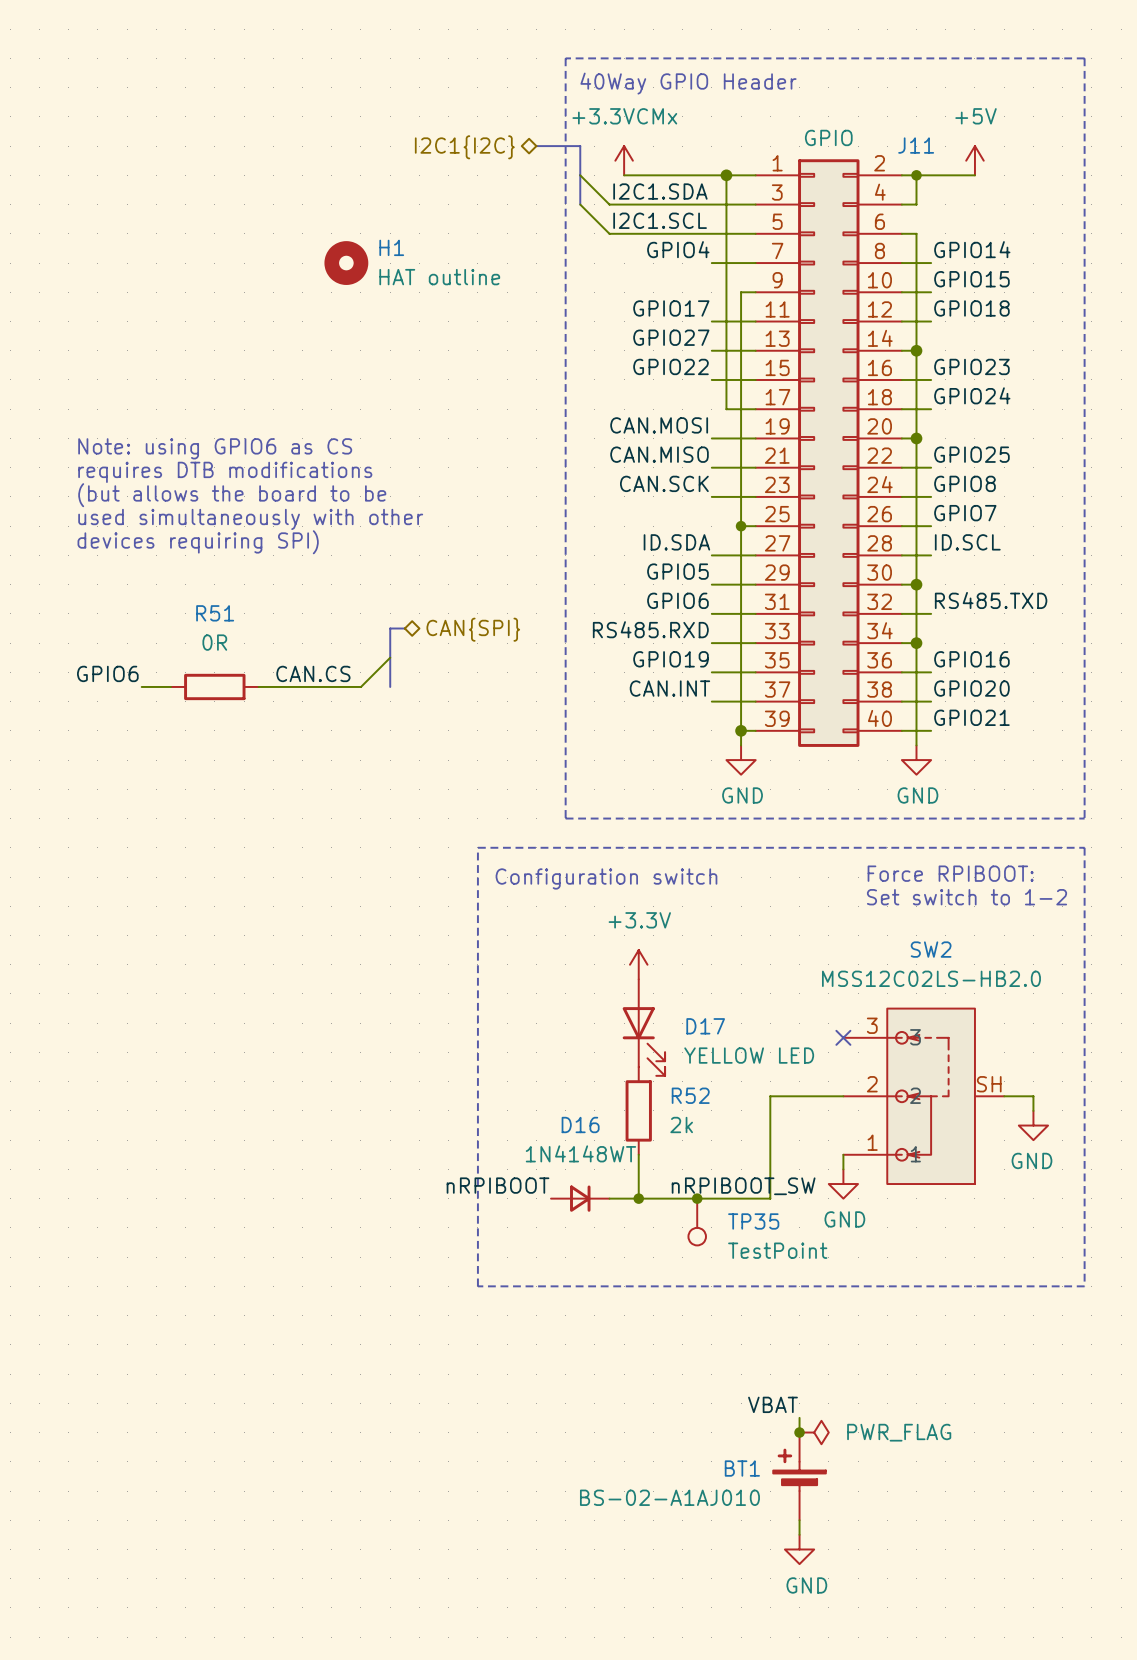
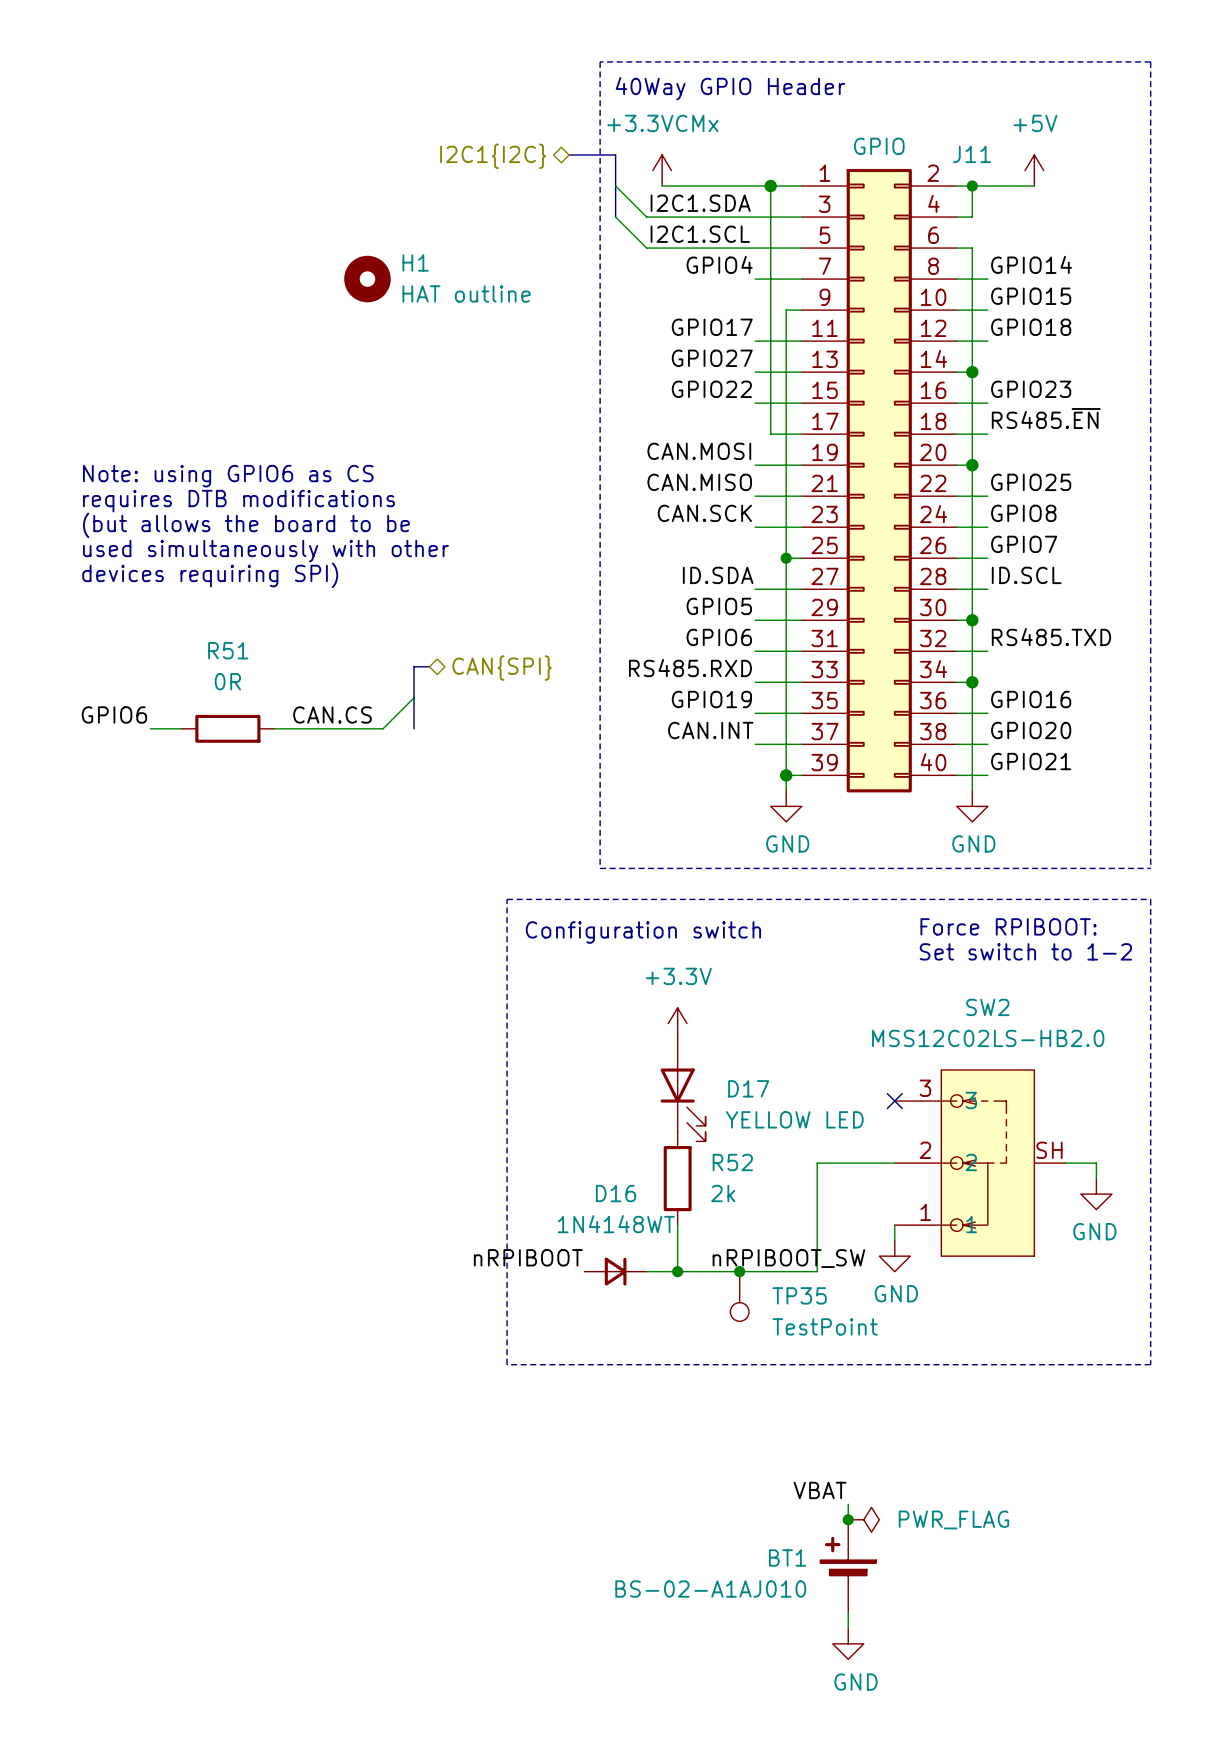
label: GPIO24 (972, 395) -> RS485.~{EN} (1046, 418)

